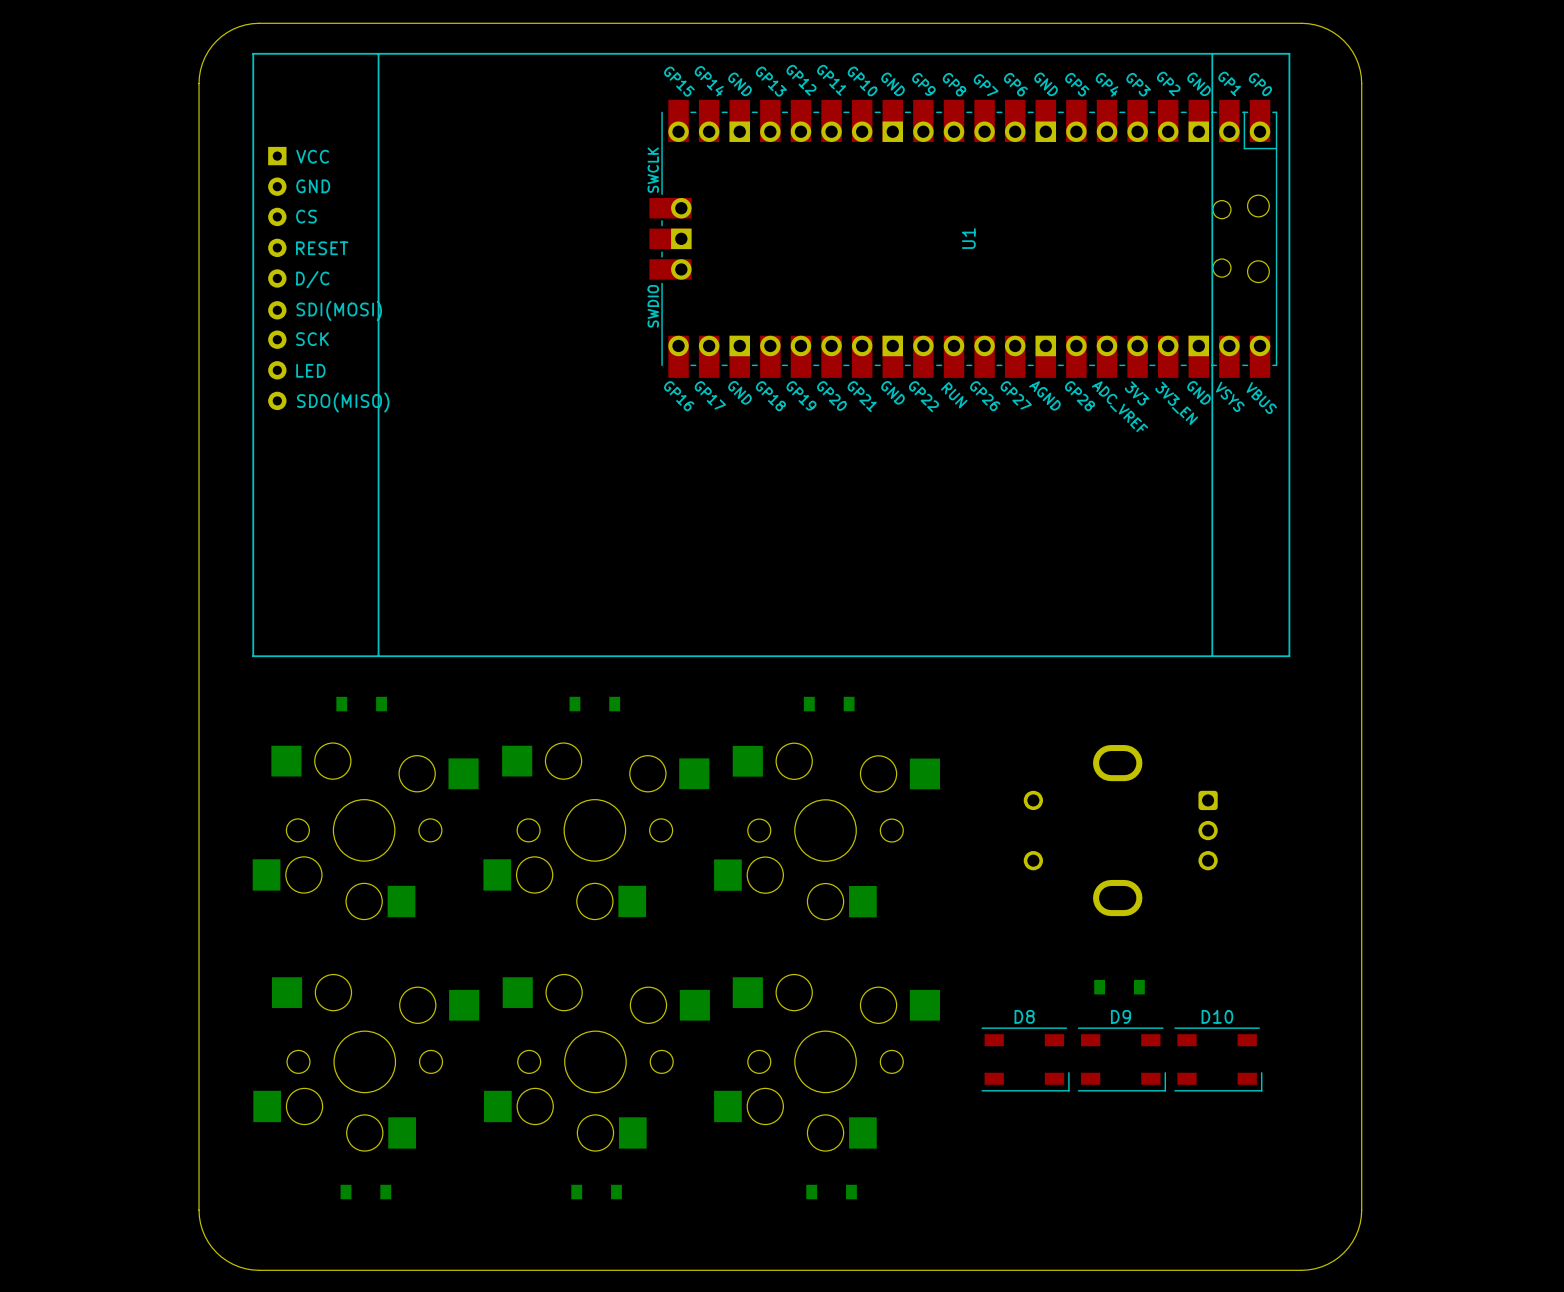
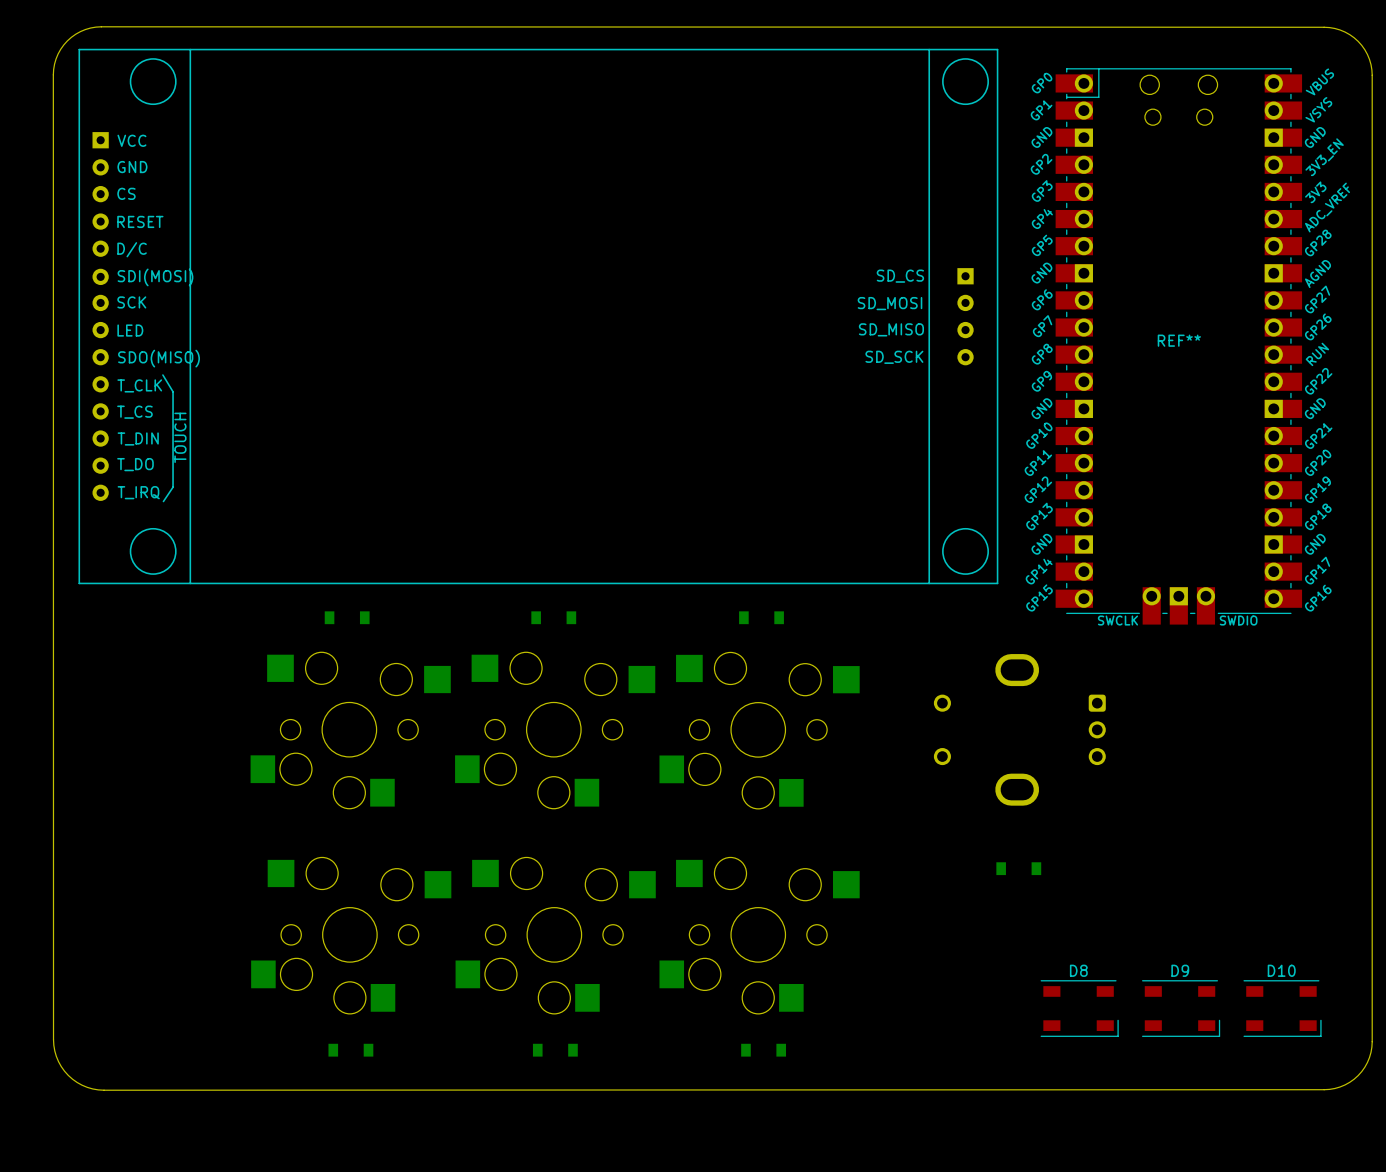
board edge: (259, 23) (1301, 23) (1314, 24) (1327, 29) (1339, 36) (1348, 45) (1358, 63) (1361, 83) (1361, 1210) (1360, 1223) (1355, 1236) (1348, 1247) (1339, 1257) (1321, 1266) (1301, 1270) (259, 1270) (245, 1268) (233, 1264) (221, 1257) (212, 1247) (202, 1229) (199, 1210) (199, 83) (202, 63) (208, 51) (216, 40) (227, 32) (239, 26) (259, 23) -> (101, 26) (80, 31) (67, 40) (58, 54) (53, 74) (53, 1039) (58, 1061) (72, 1079) (87, 1087) (104, 1090) (1324, 1089) (1345, 1084) (1361, 1071) (1369, 1057) (1372, 1041) (1372, 75) (1367, 54) (1354, 37) (1340, 29) (1324, 27) (101, 26)
U1: (963, 238) -> none
part: (771, 355) -> none
part: none -> (538, 316)
REF**: none -> (1178, 346)
D8 position: (1025, 1059) -> (1079, 1008)
D9 position: (1121, 1059) -> (1181, 1008)
D10 position: (1218, 1059) -> (1282, 1008)

